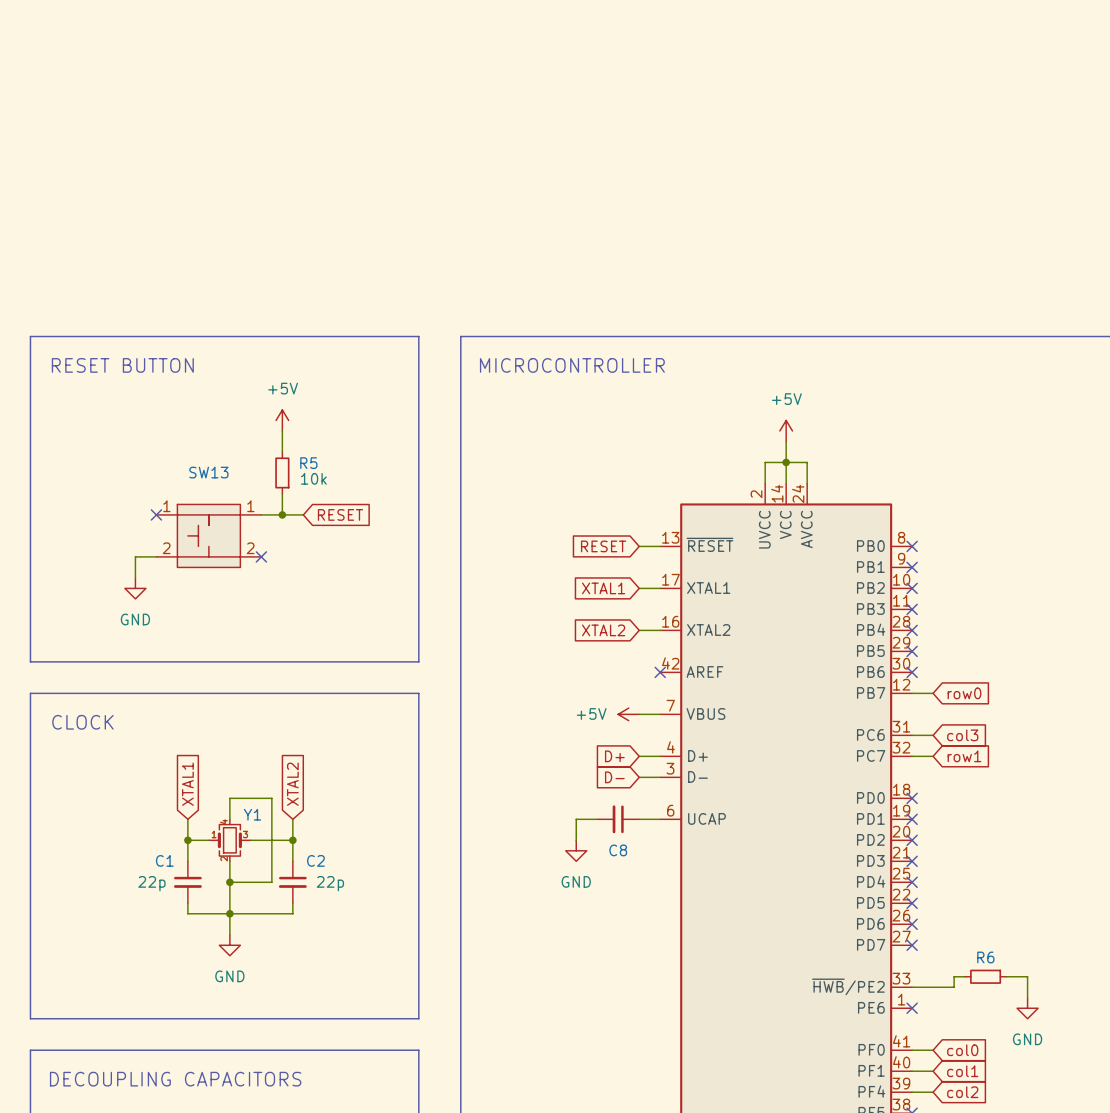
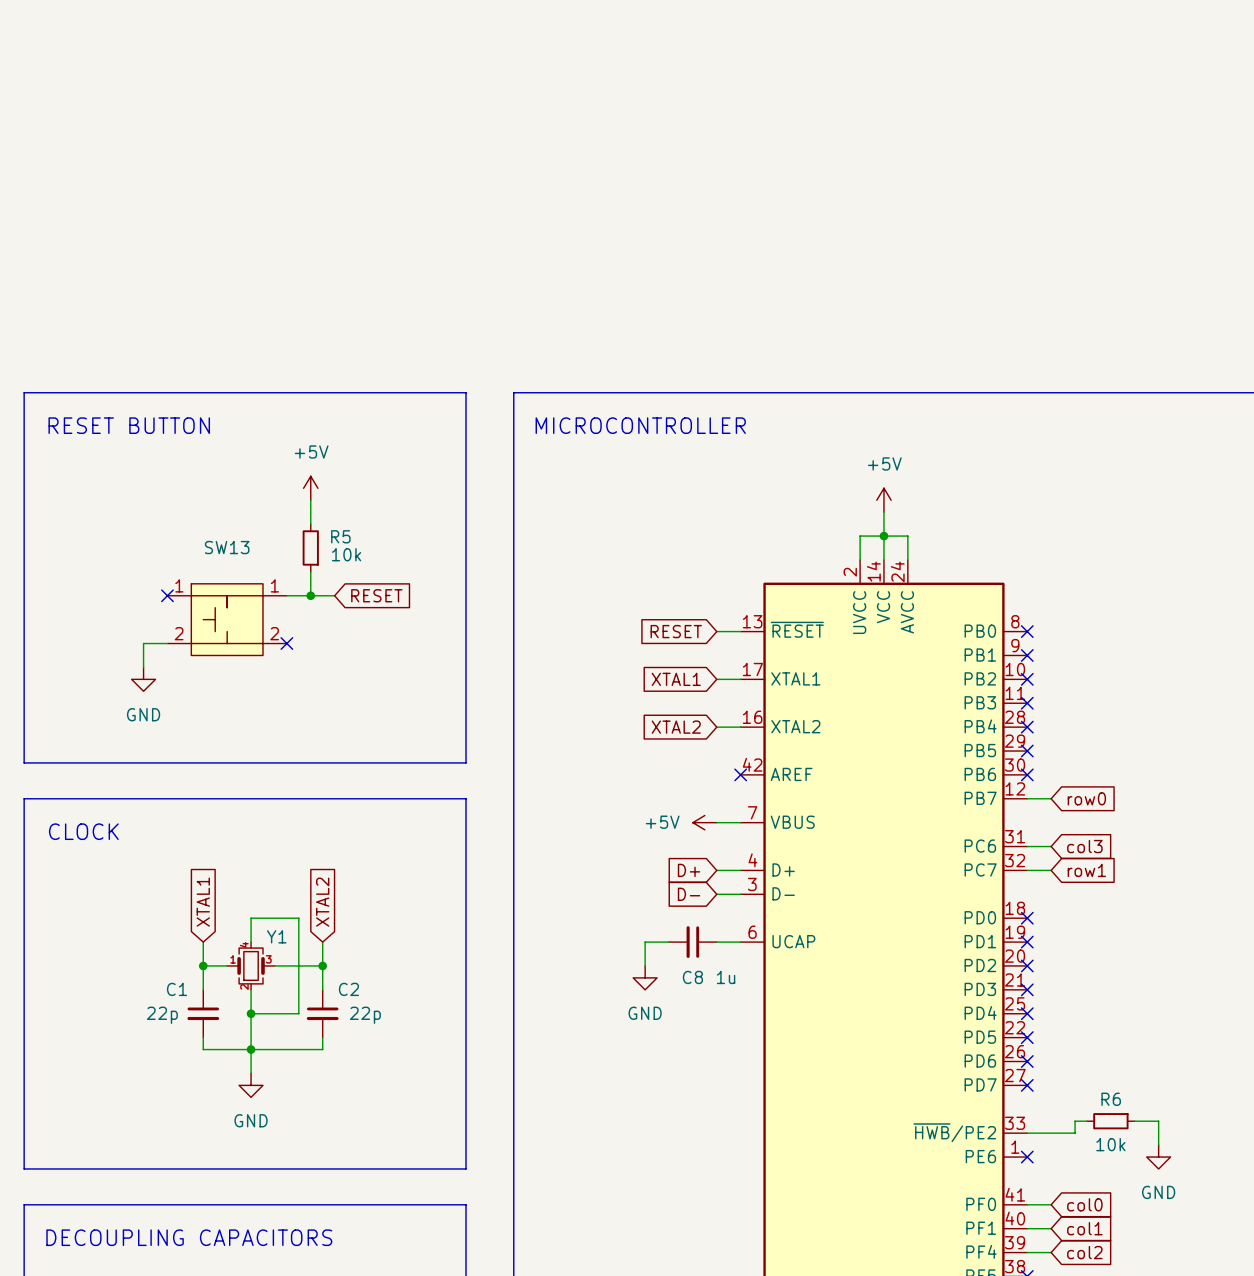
C8 value: none -> 1u (726, 977)
R6 value: none -> 10k (1110, 1144)

